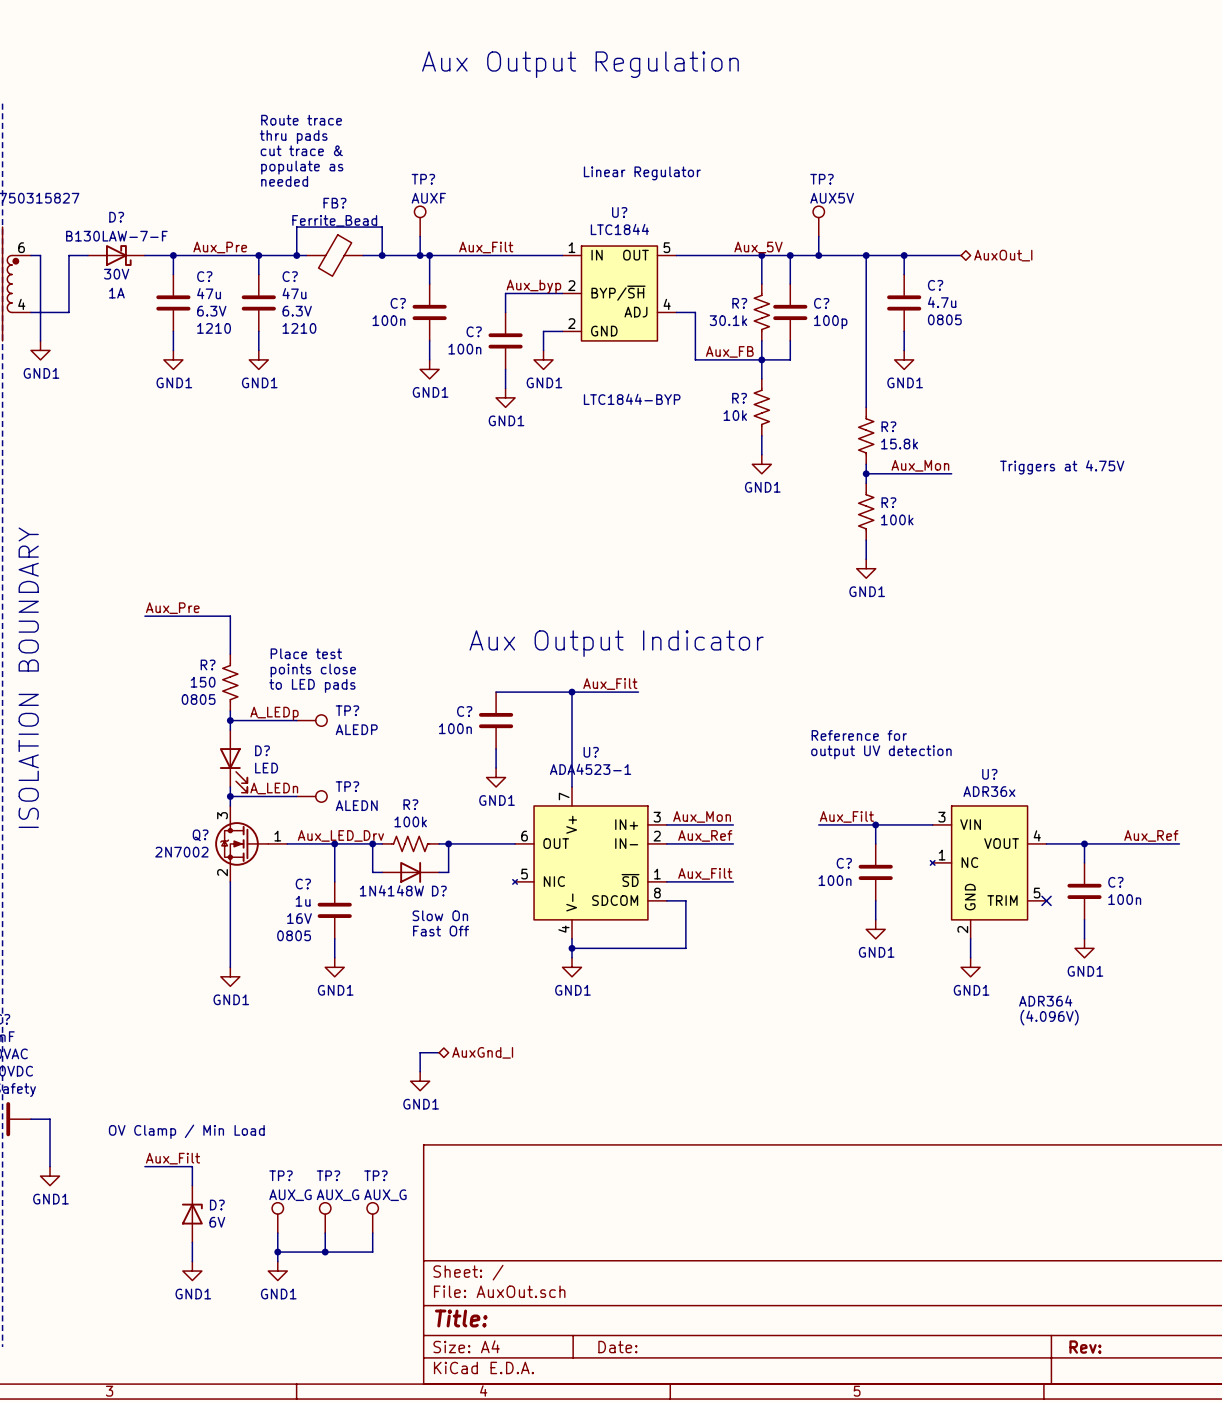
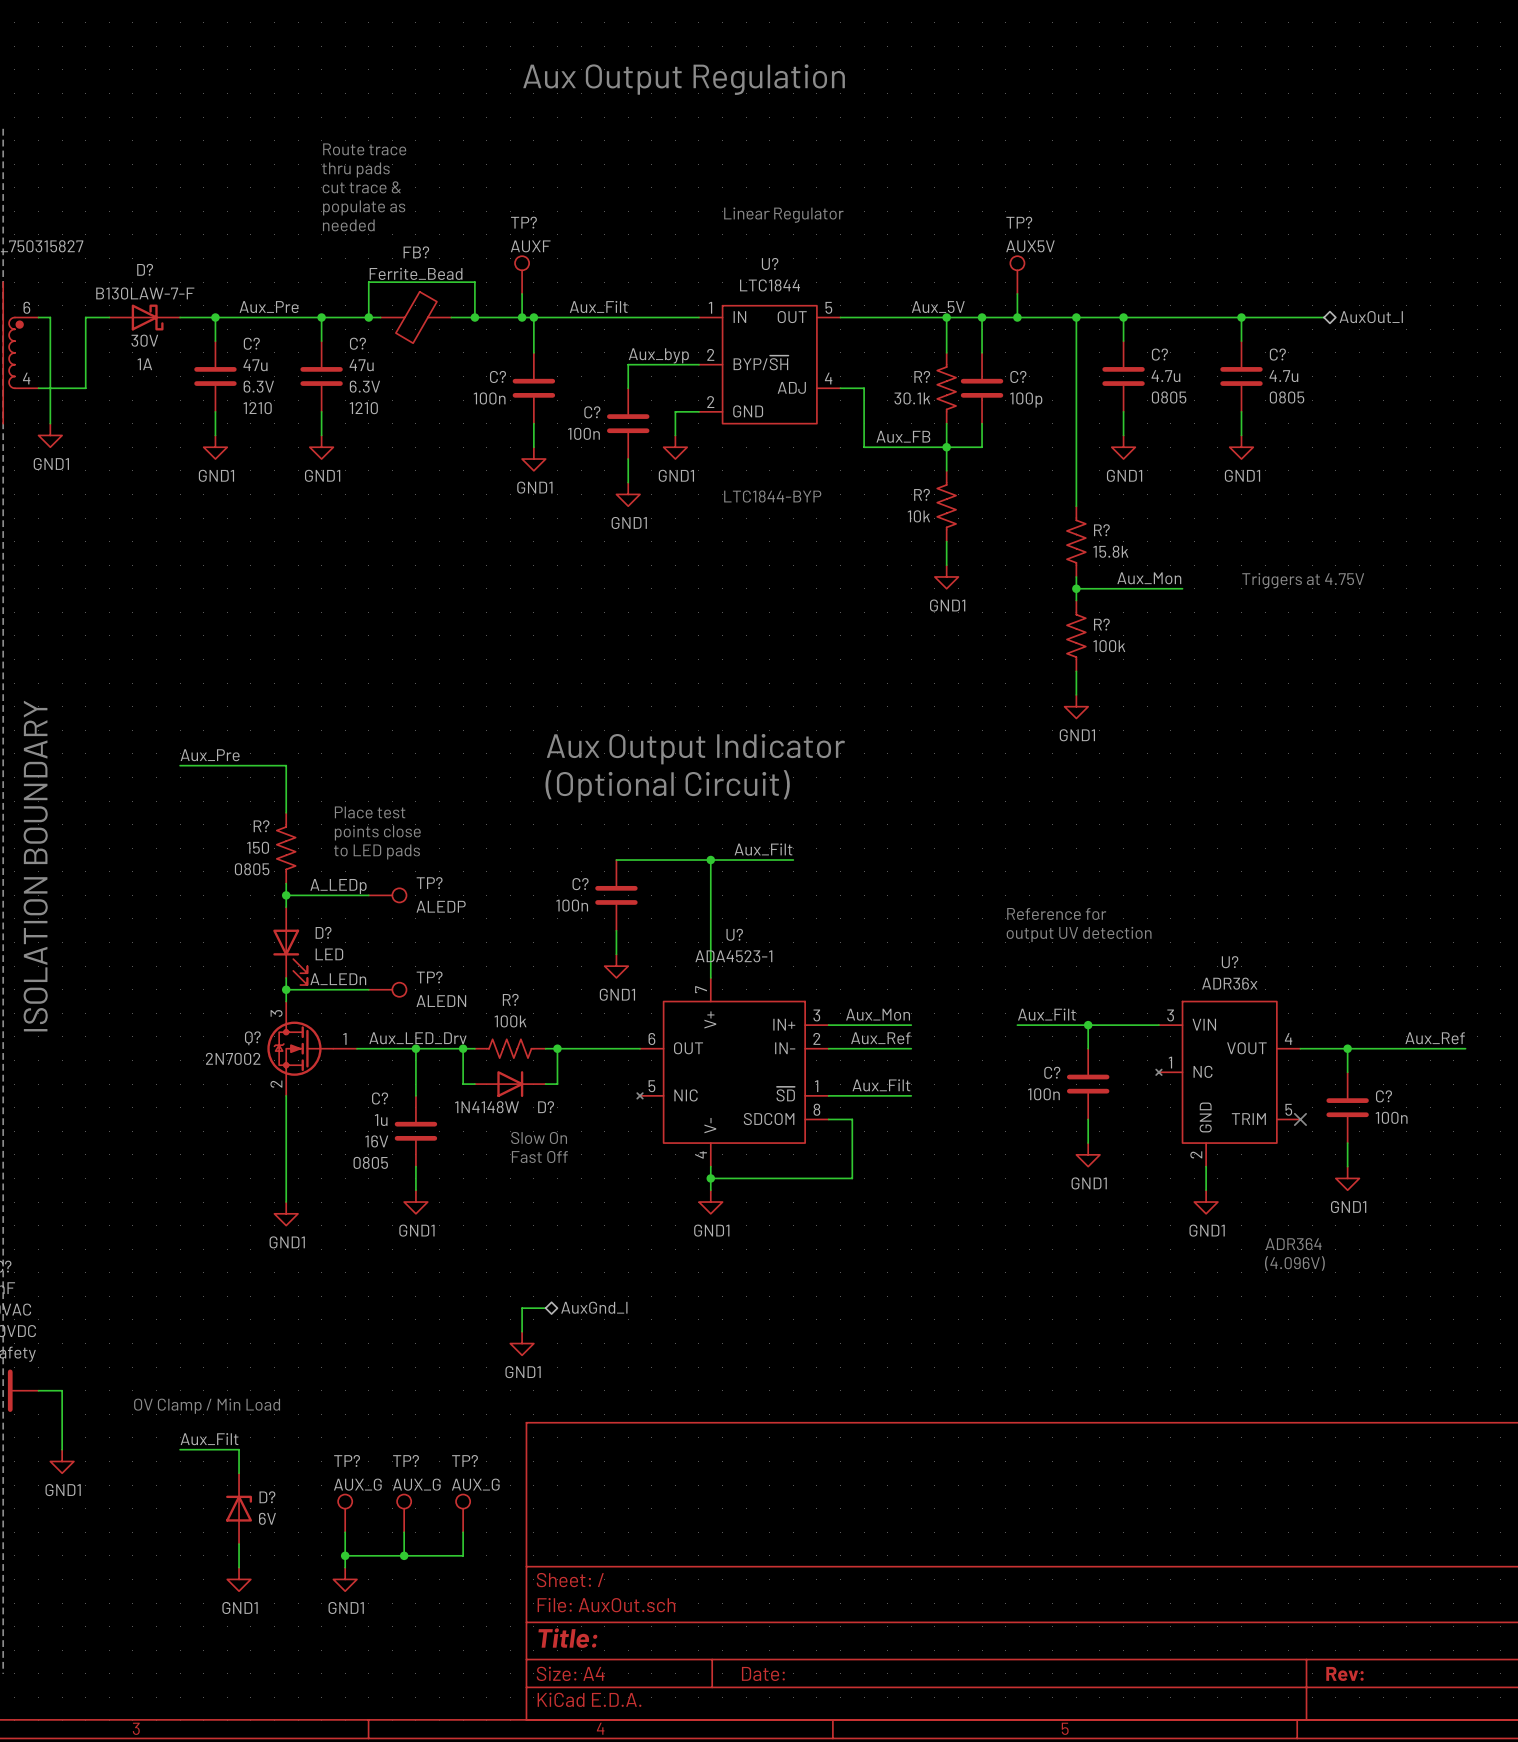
wire: none -> (1194, 317) (1324, 317)
wire: none -> (1241, 317) (1241, 341)
junction: none -> (1241, 317)
hierarchical label position: AuxOut_I (1003, 255) -> AuxOut_I (1371, 317)
C?: none -> 4.7u (1241, 376)
wire: none -> (1241, 411) (1241, 435)
power symbol: none -> GND1 (1241, 447)
text: none -> (Optional Circuit) (667, 786)
text position: Aux Output Indicator (616, 643) -> Aux Output Indicator (695, 749)

